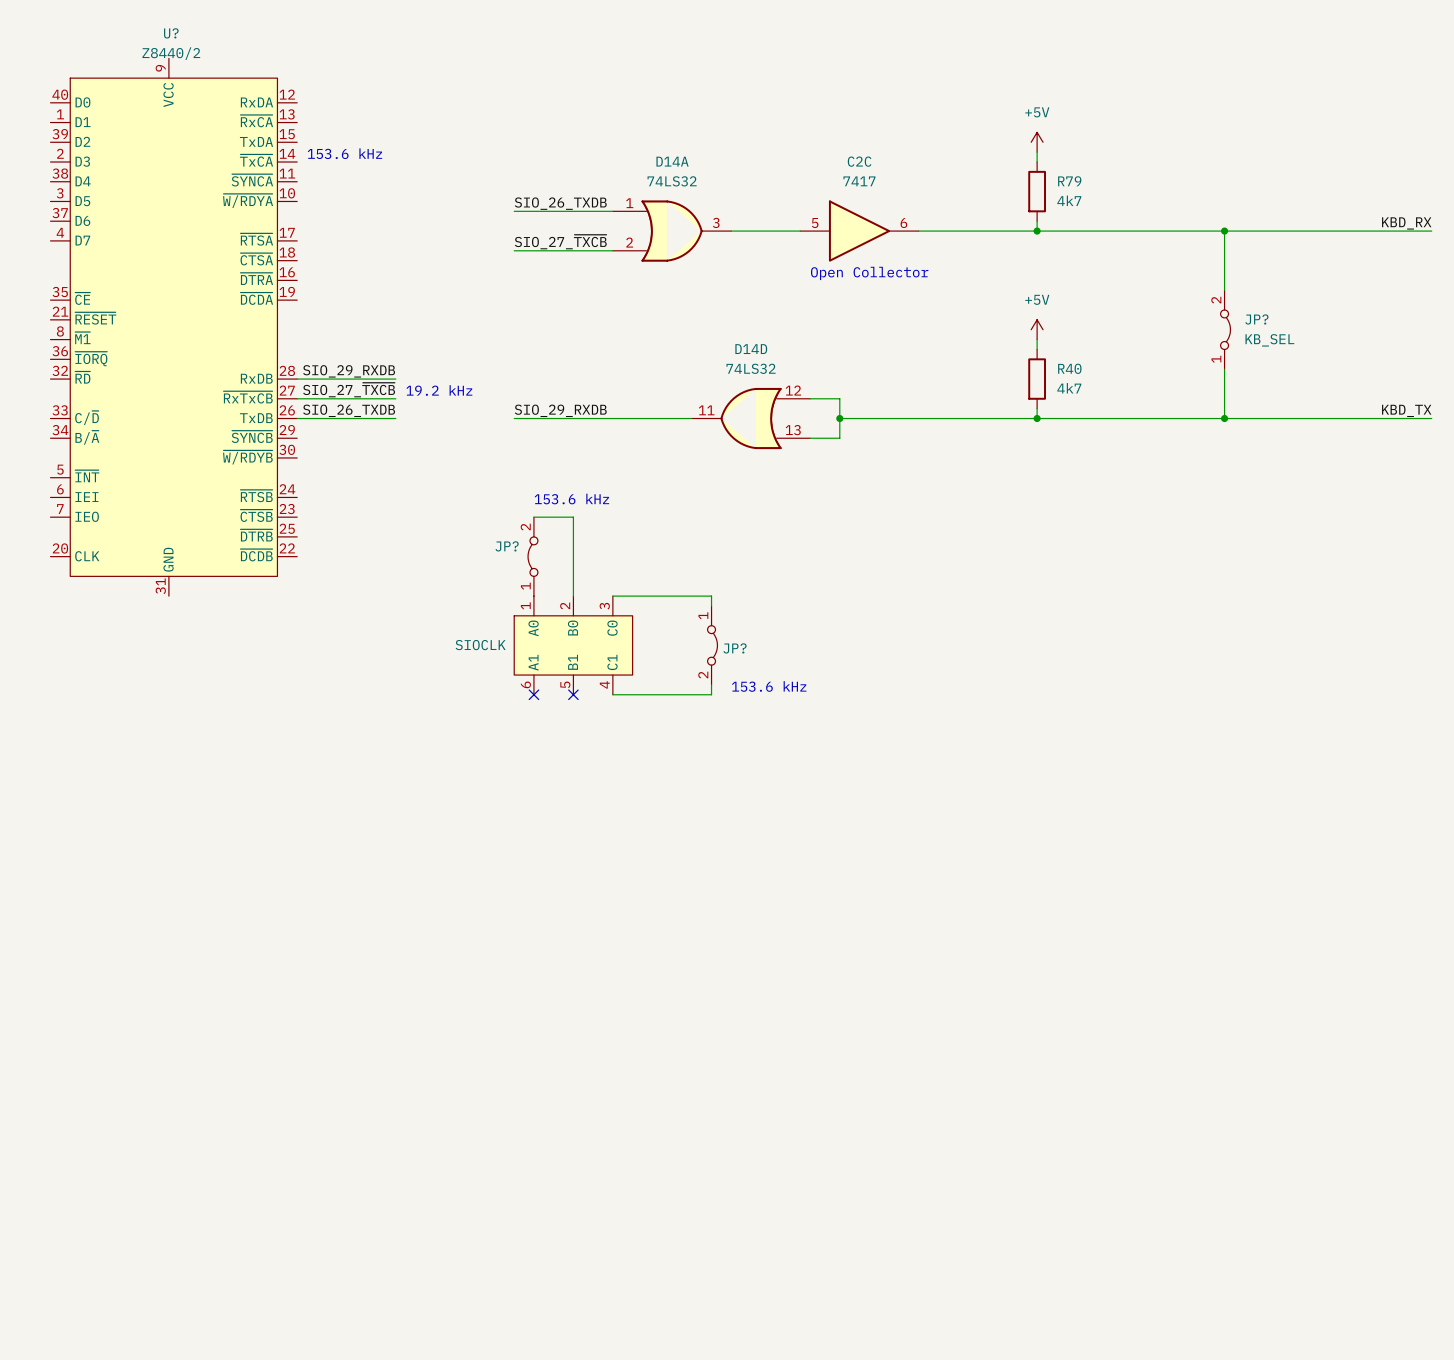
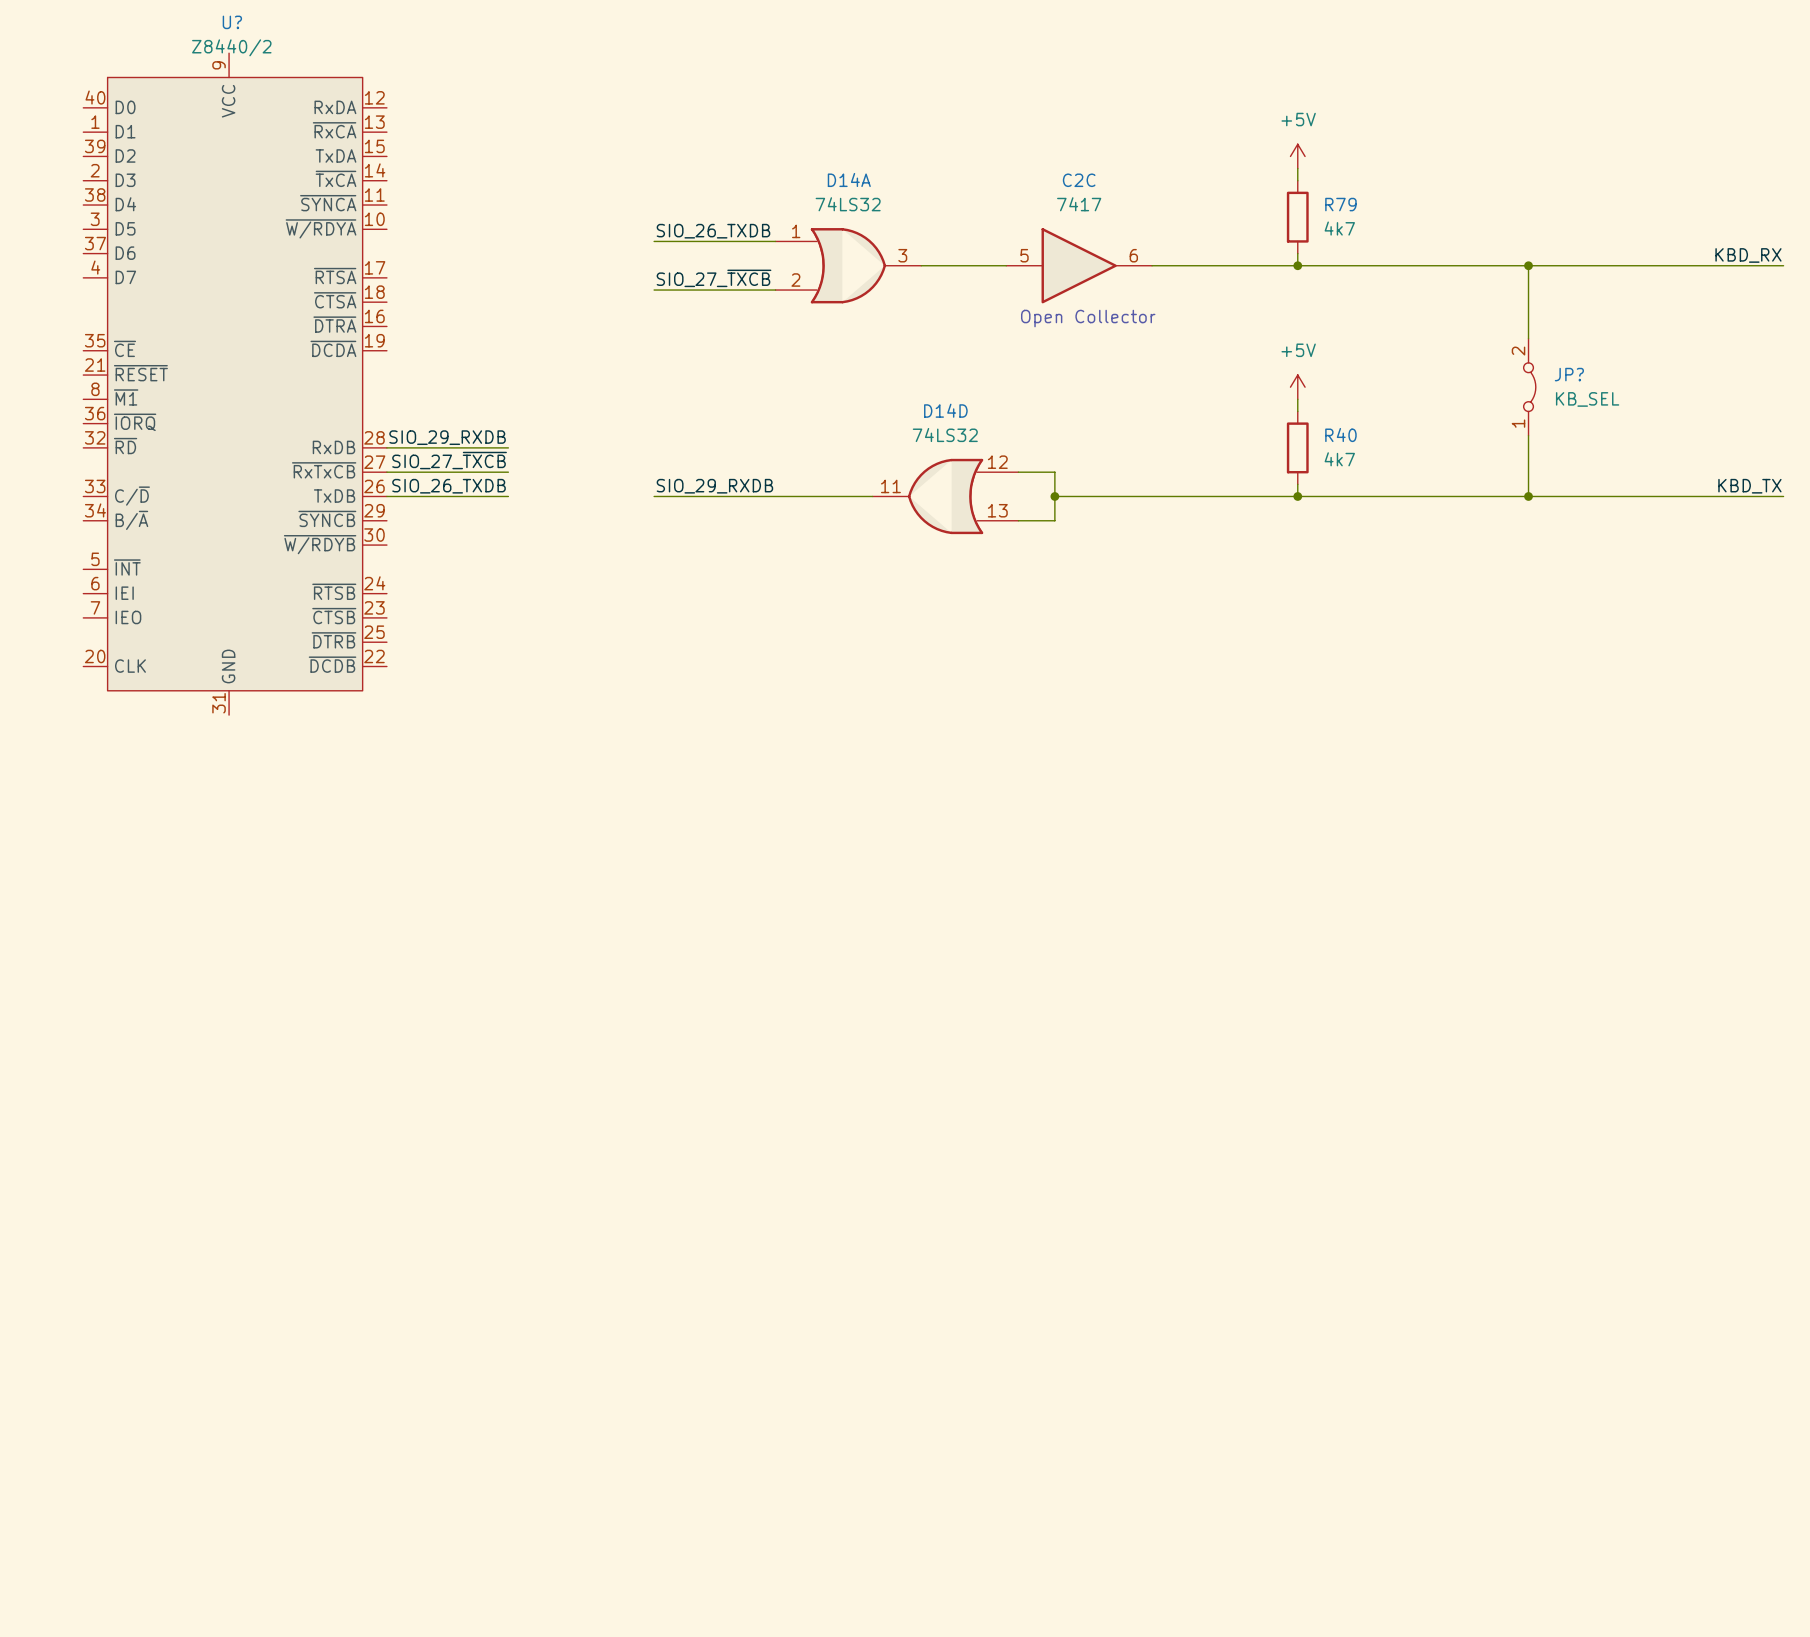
text: 153.6 kHz (344, 153) -> none
text: 19.2 kHz (439, 390) -> none
text: 153.6 kHz (571, 499) -> none
wire: (533, 517) (573, 517) (573, 596) -> none
JP?: (532, 556) -> none
wire: (612, 596) (711, 596) (711, 605) -> none
part: SIOCLK (573, 645) -> none
JP?: (712, 645) -> none
wire: (711, 684) (711, 694) (612, 694) -> none
text: 153.6 kHz (769, 686) -> none
no-connect mark: (533, 694) -> none
no-connect mark: (573, 694) -> none

